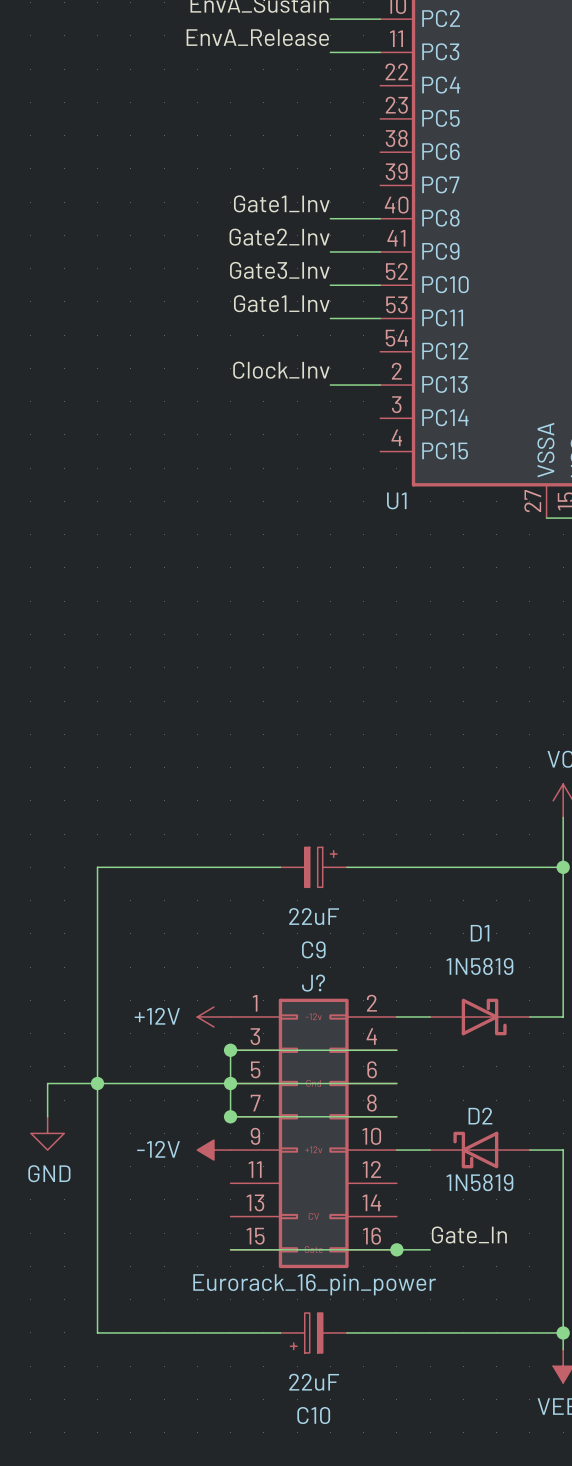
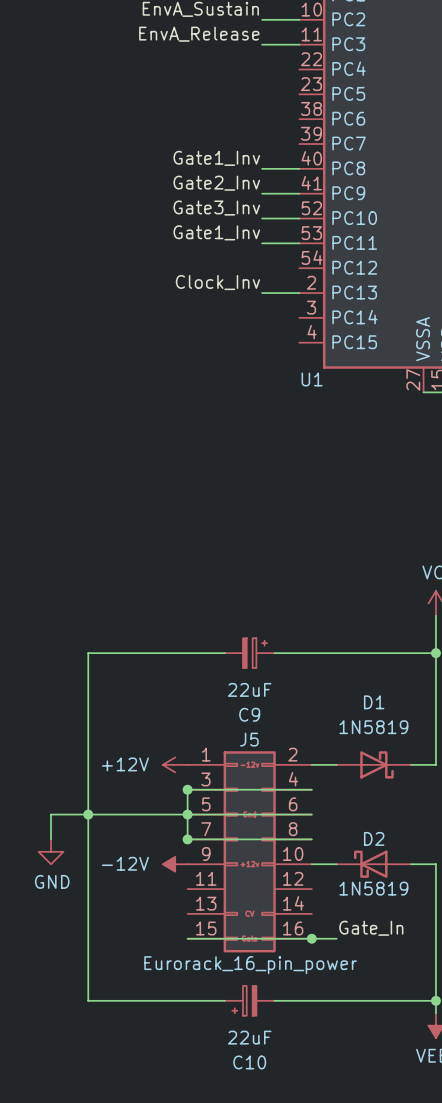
J? name: J? (313, 983) -> J5 (249, 739)

